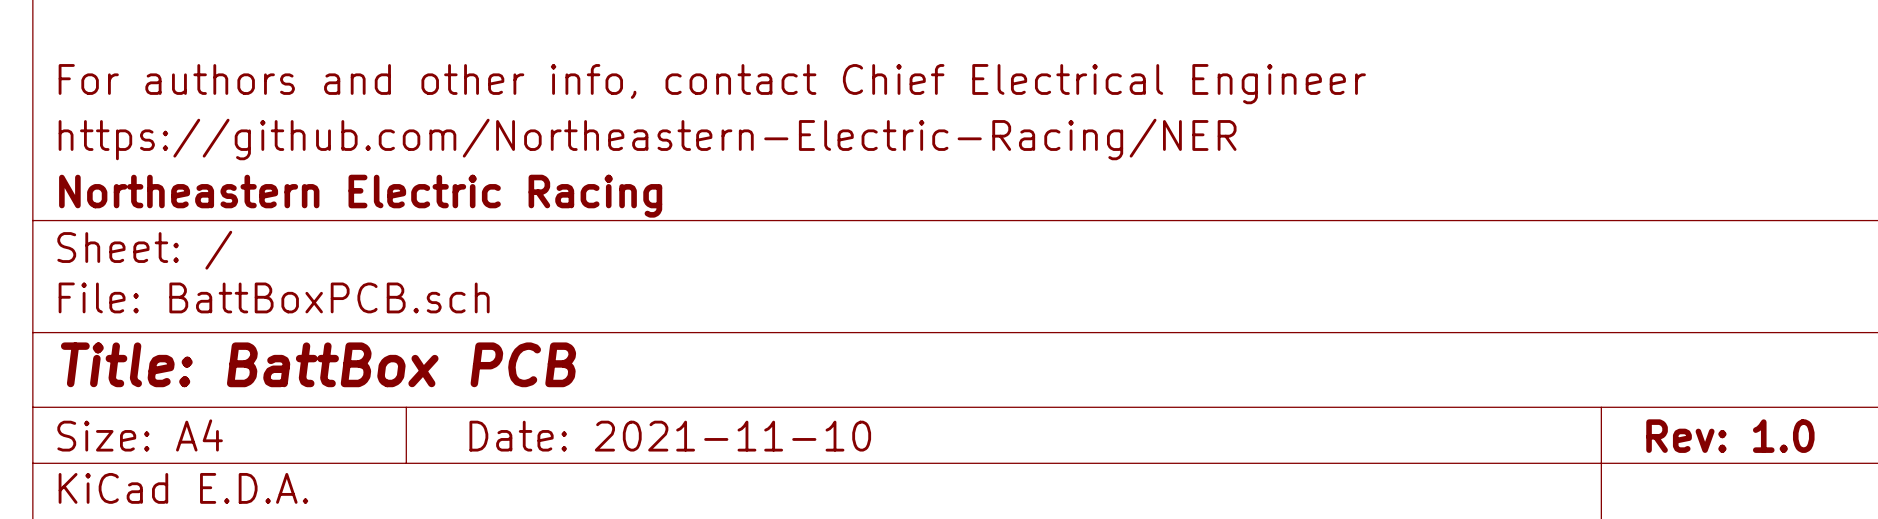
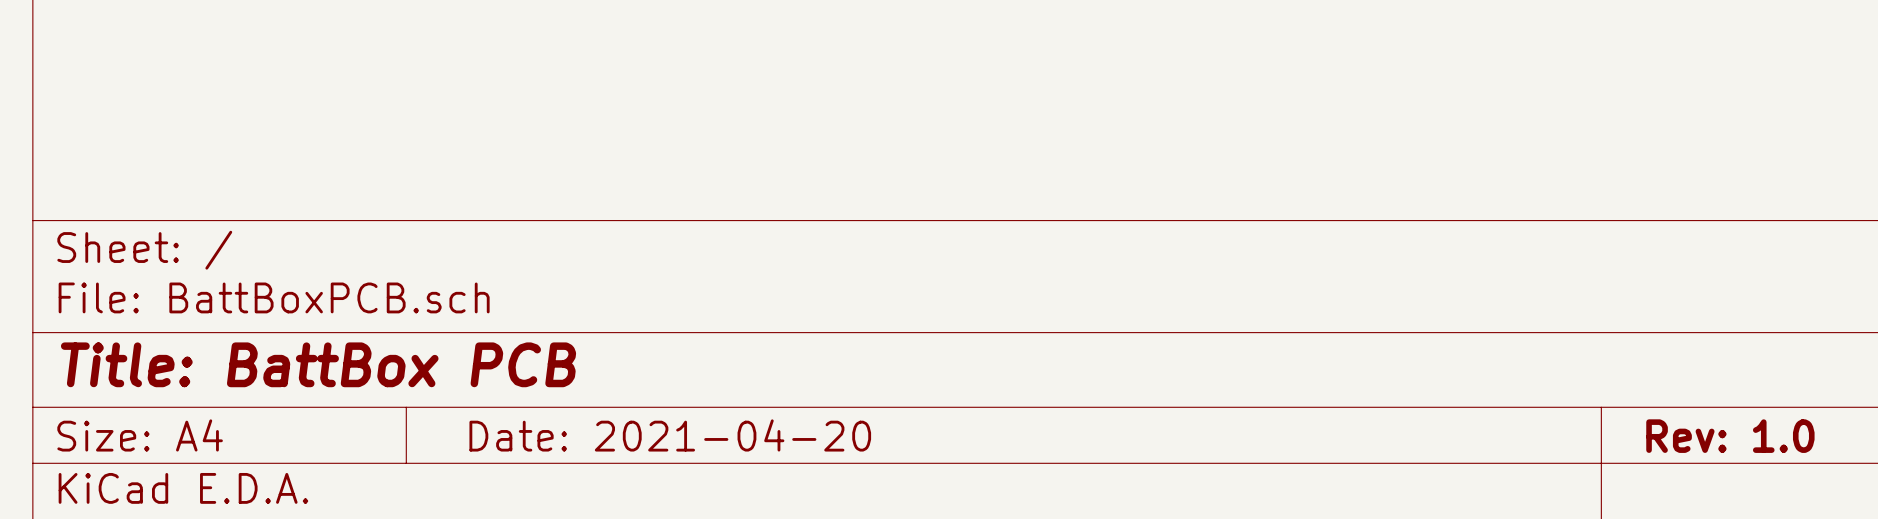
title block: For authors and other info, contact Chief Electrical Engineer (712, 84) -> none
title block: https://github.com/Northeastern-Electric-Racing/NER (647, 139) -> none
title block: Northeastern Electric Racing (360, 196) -> none
title block: Date: 2021-11-10 (670, 436) -> Date: 2021-04-20 (670, 435)

